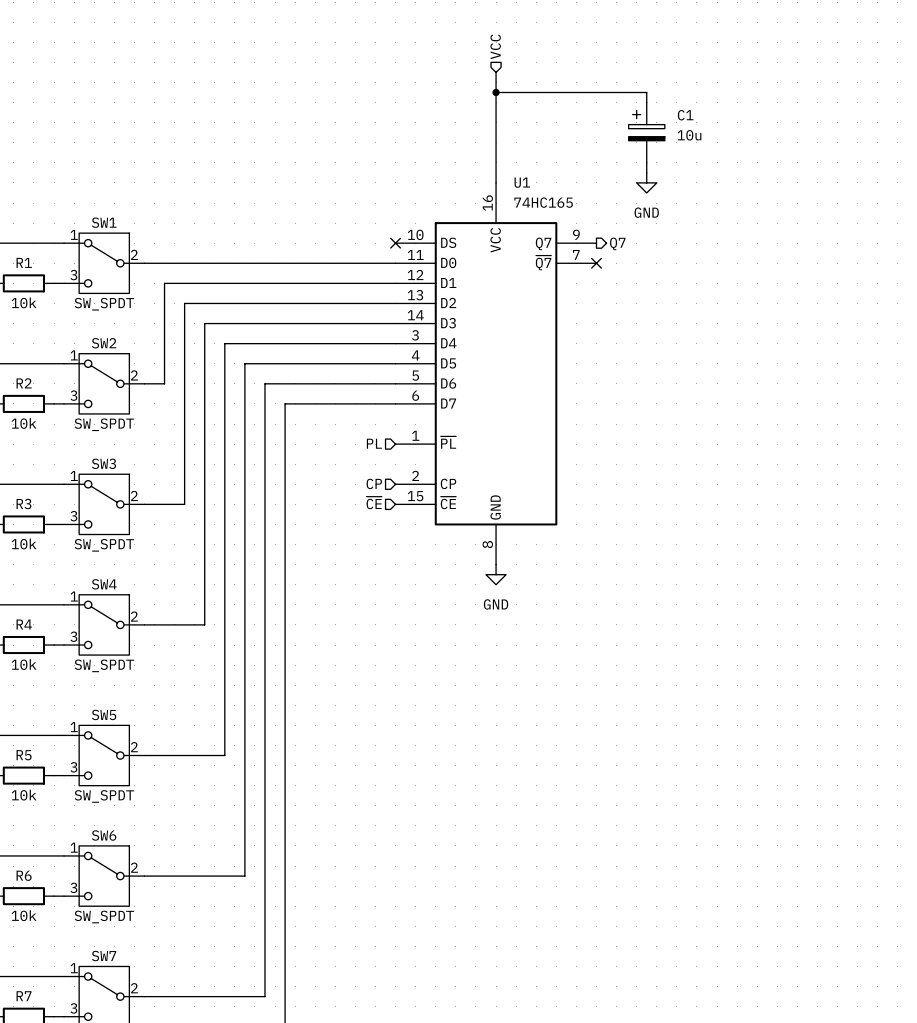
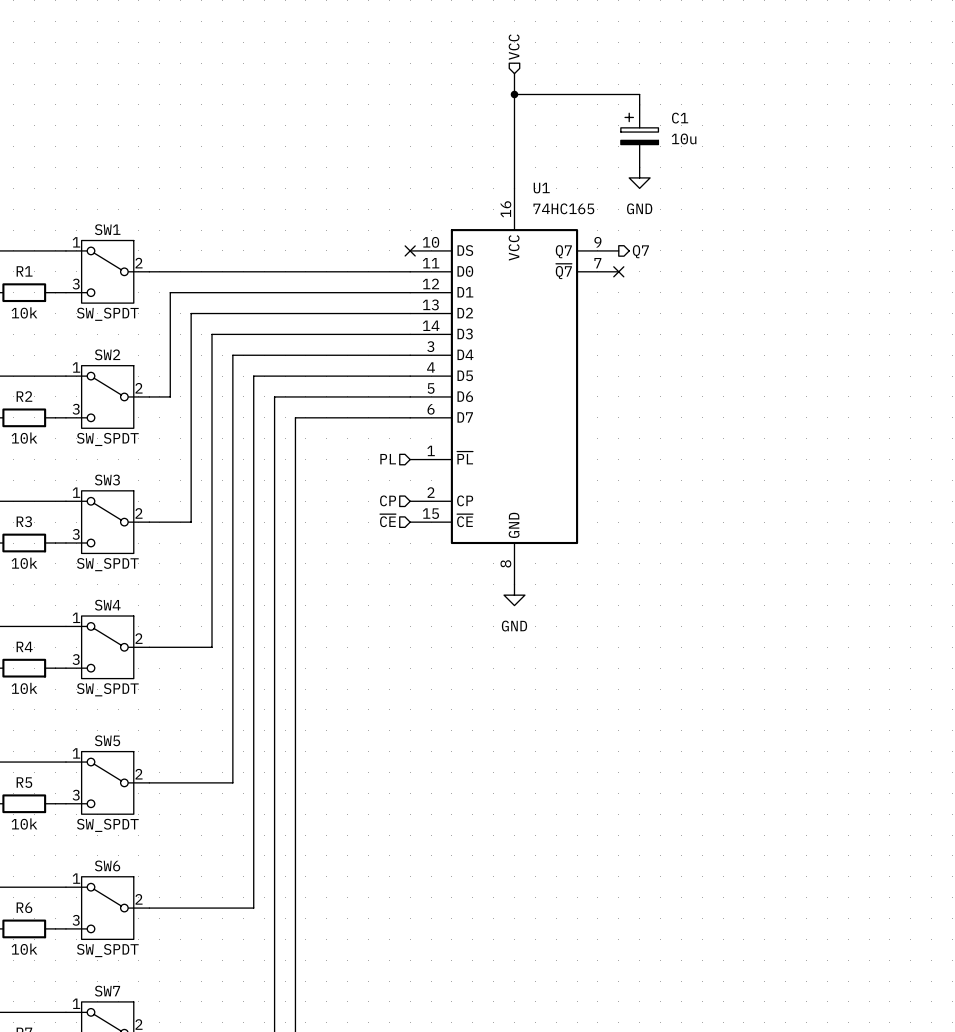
wire: (616, 92) (646, 92) (646, 102) -> (639, 94) (639, 104)
C1 position: (646, 132) -> (639, 136)
wire: (646, 162) (646, 172) -> none
power symbol position: GND (646, 182) -> GND (639, 177)

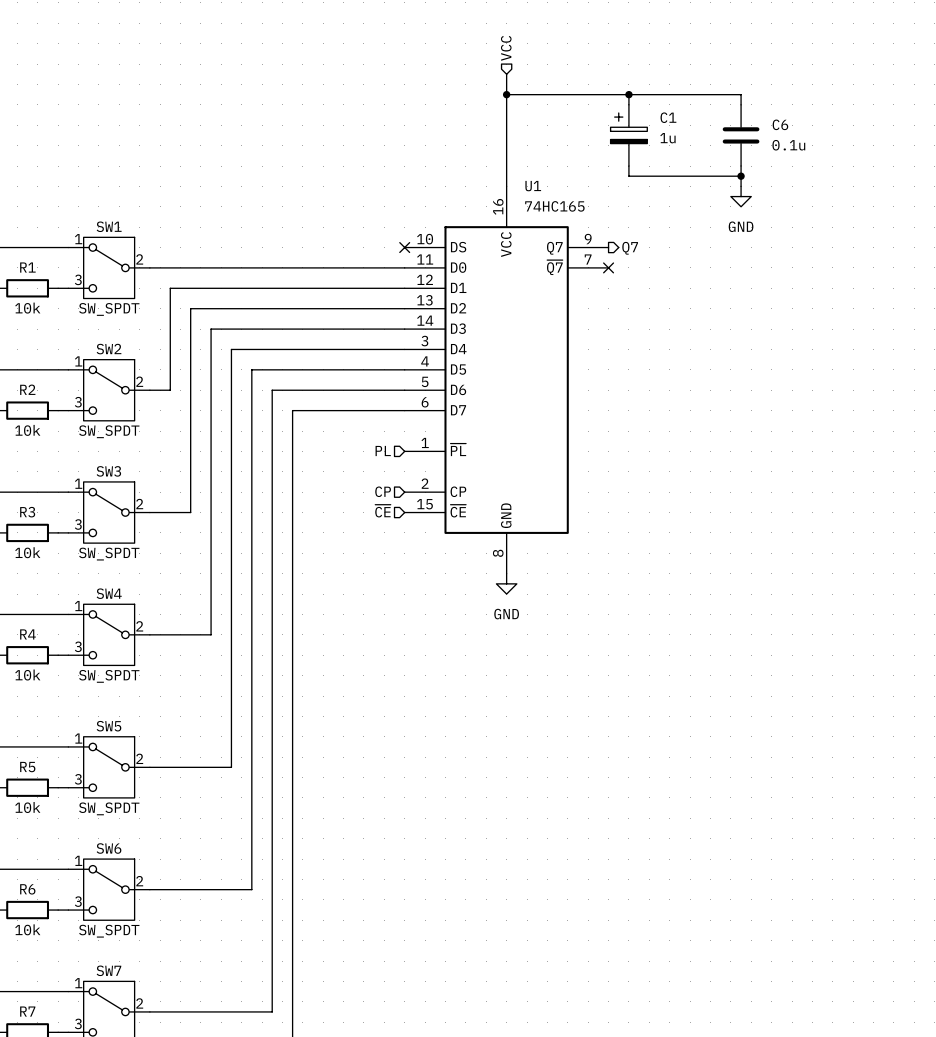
wire: none -> (628, 94) (741, 94) (741, 104)
junction: none -> (628, 94)
C6: none -> 0.1u (741, 135)
C1 value: 10u (684, 138) -> 1u (667, 138)
wire: none -> (628, 166) (628, 176) (741, 176)
wire: none -> (741, 166) (741, 186)
power symbol position: GND (639, 177) -> GND (741, 196)
junction: none -> (741, 176)

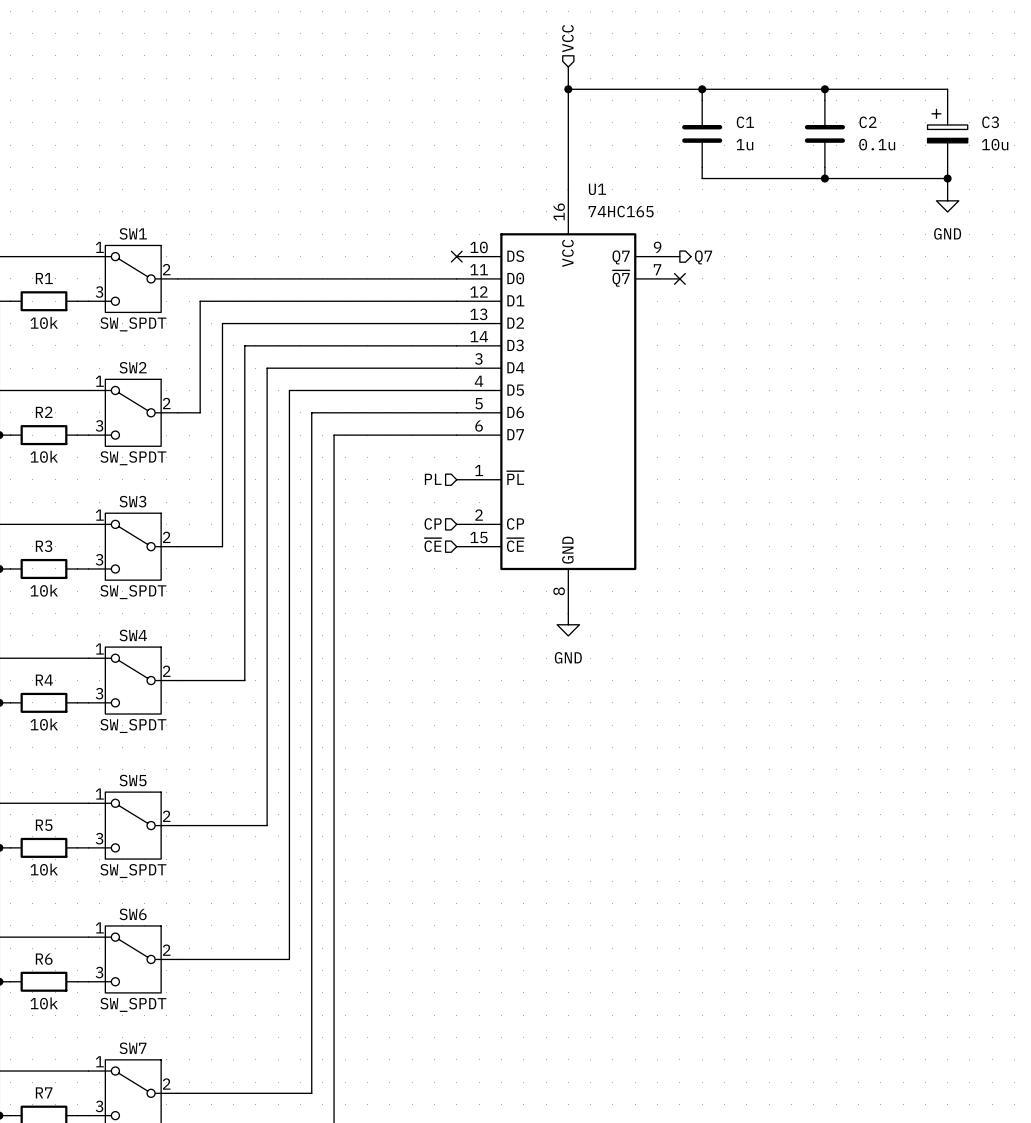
wire: none -> (824, 89) (947, 89) (947, 100)
junction: none -> (824, 89)
C1 symbol: [610, 104, 648, 167] -> [682, 100, 723, 168]
C6 name: C6 (780, 124) -> C2 (868, 122)
C3: none -> 10u (947, 133)
wire: none -> (947, 167) (947, 189)
wire: (741, 176) (741, 186) -> (824, 178) (947, 178)
junction: none -> (947, 178)
power symbol position: GND (741, 196) -> GND (947, 200)

